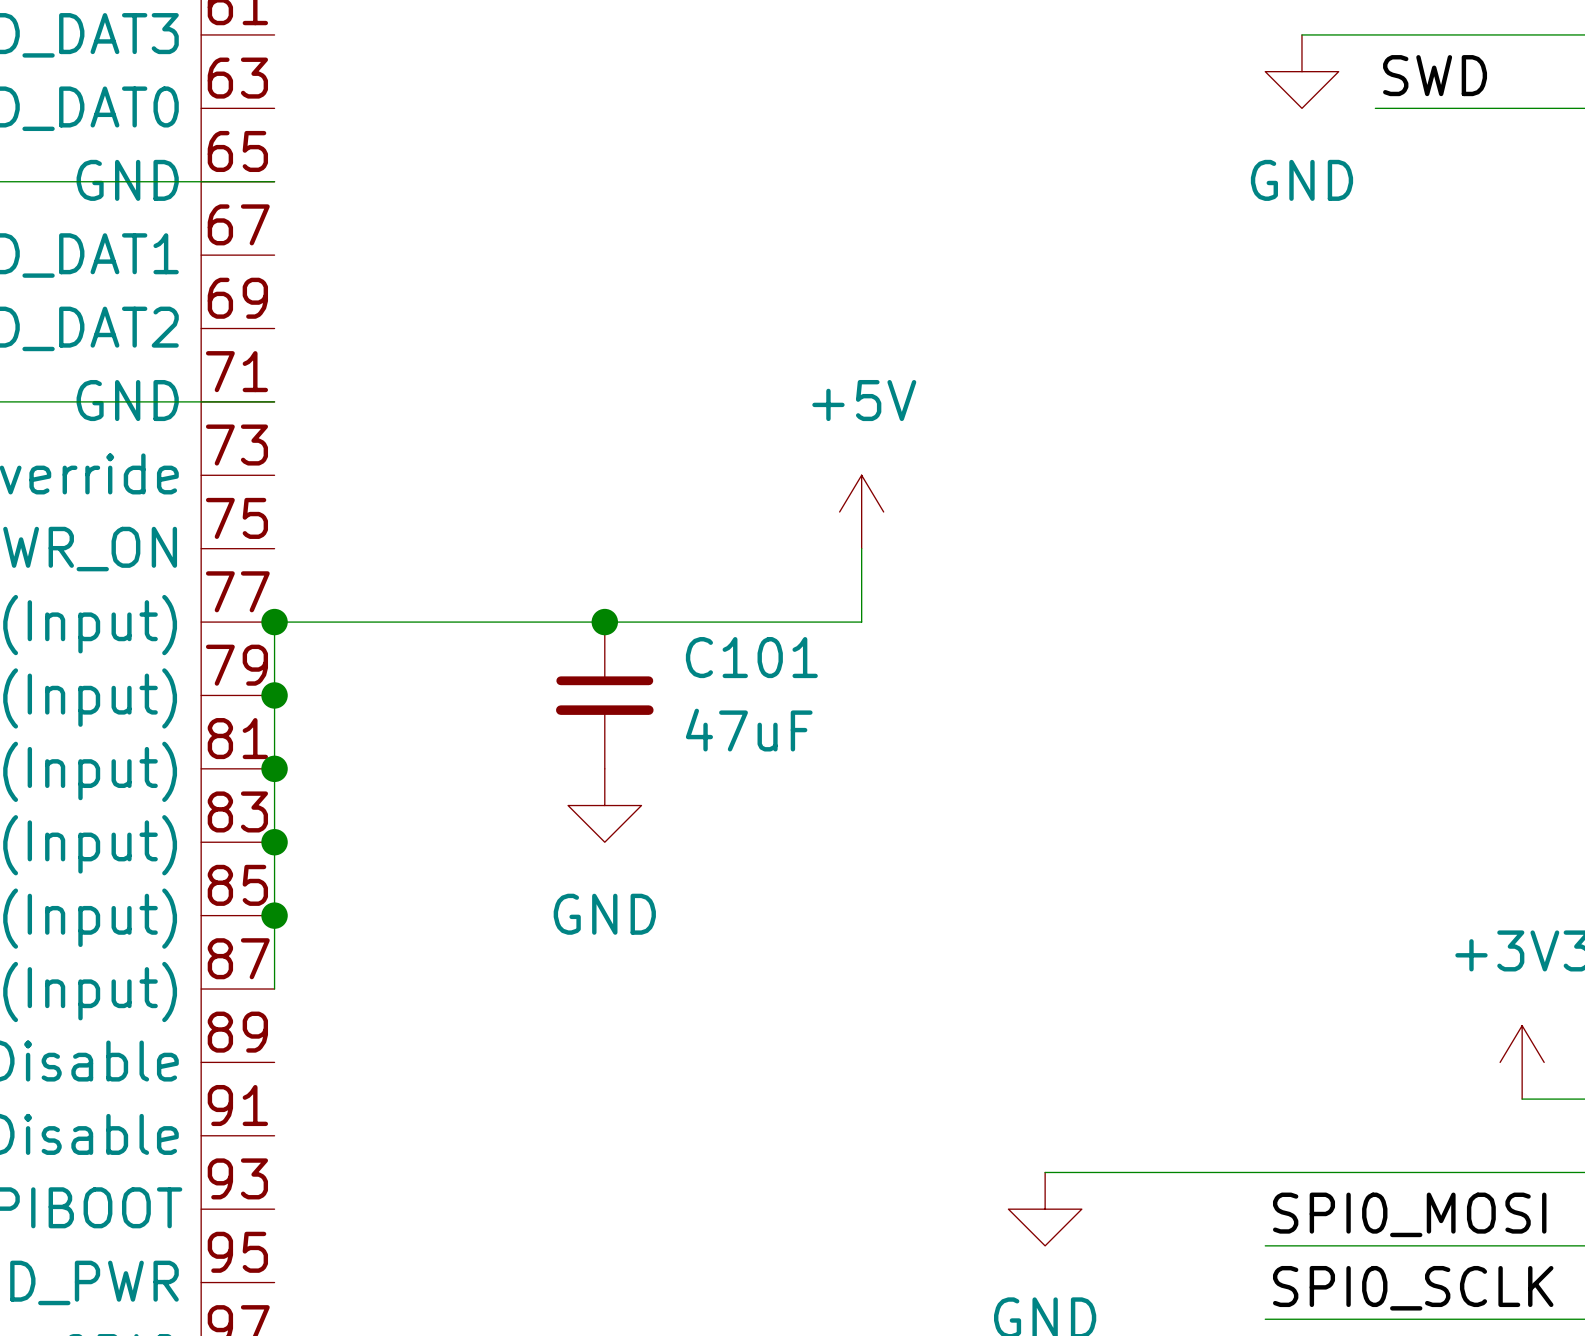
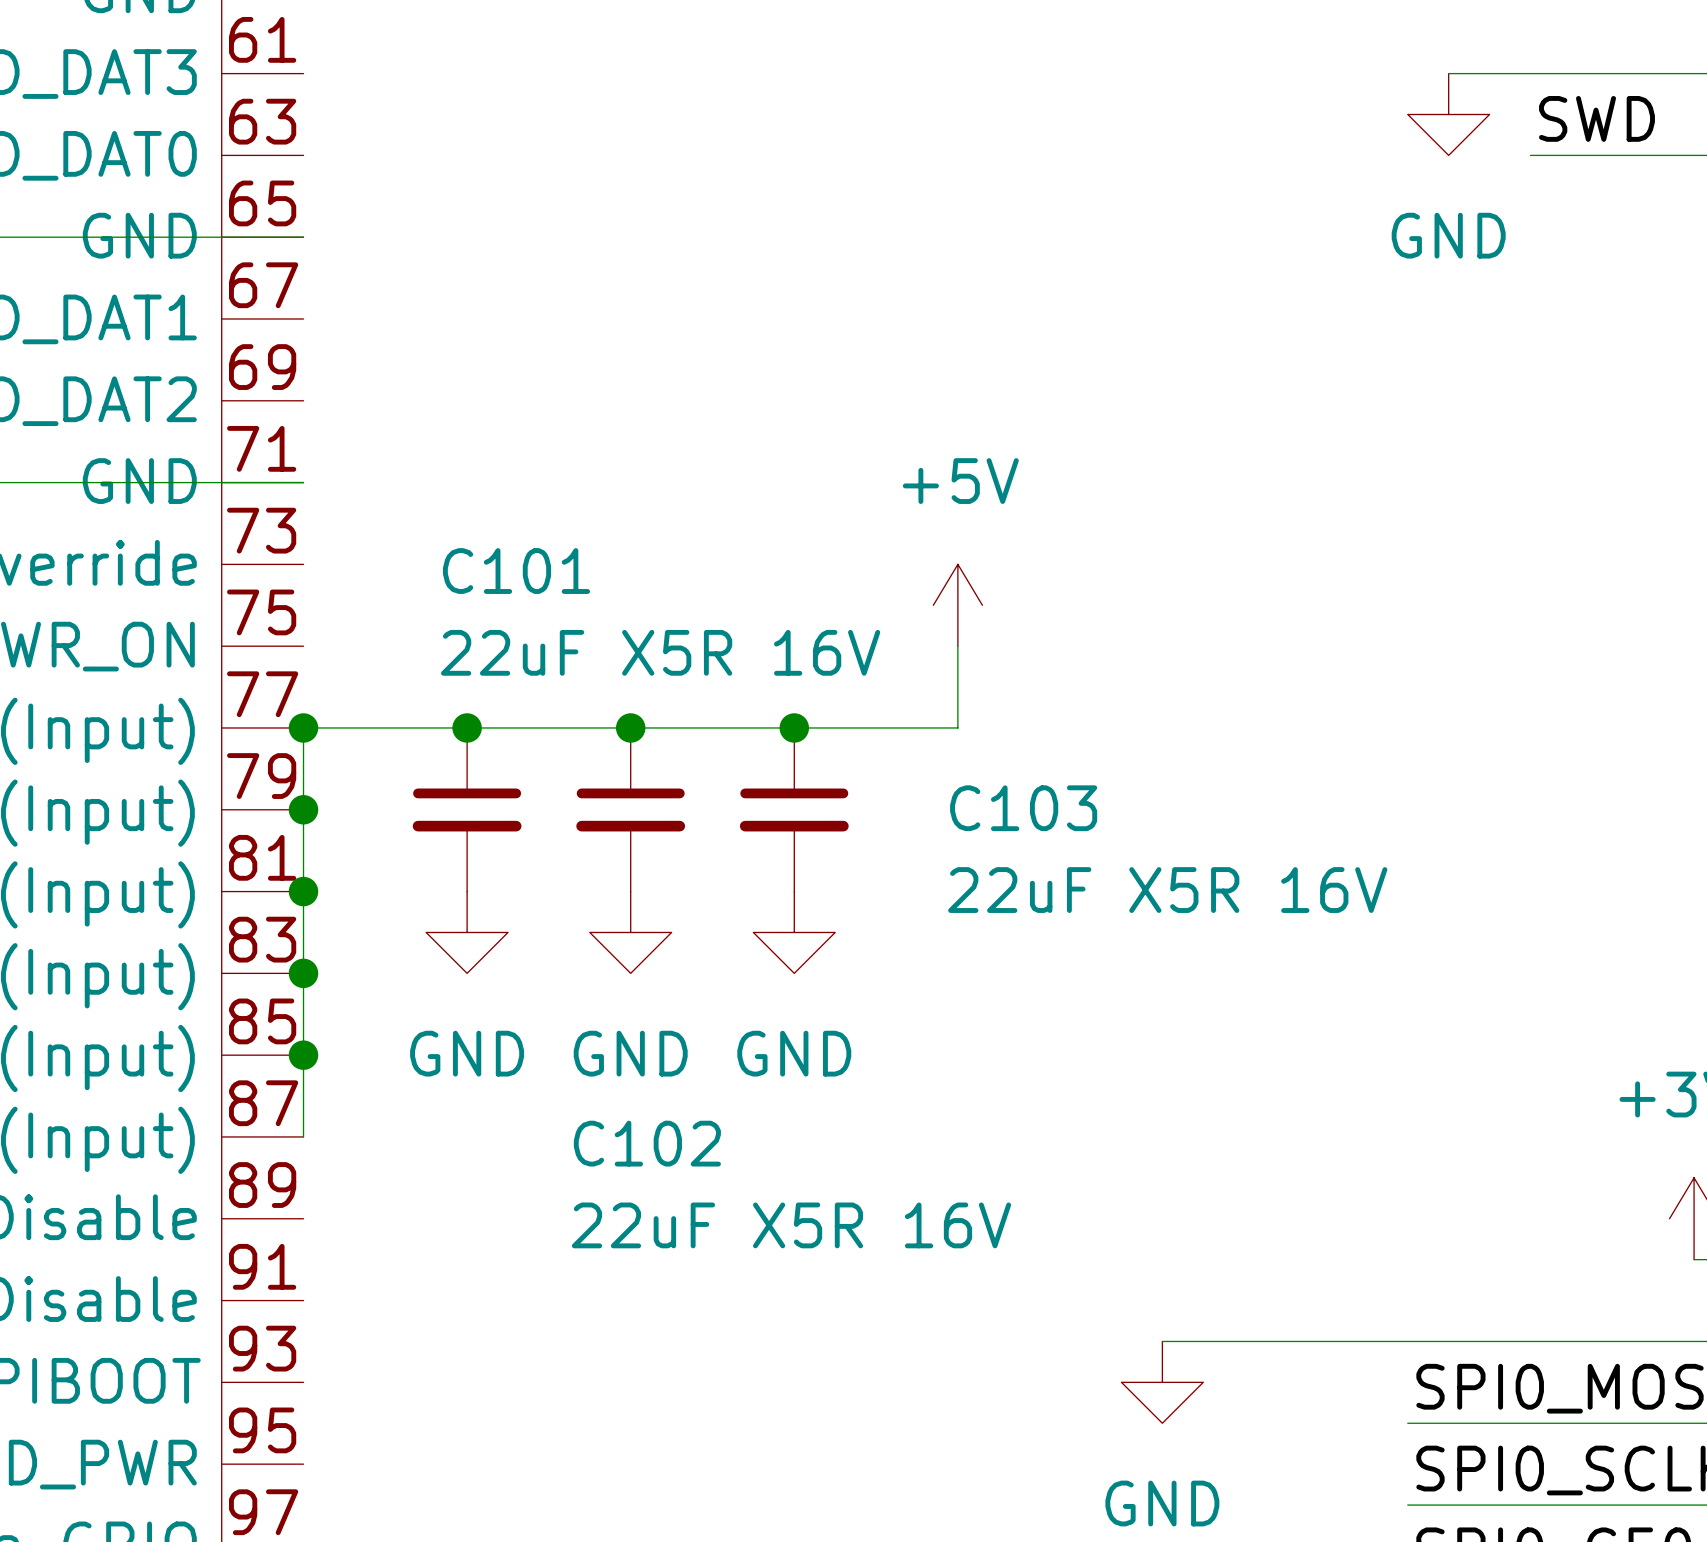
junction: none -> (467, 727)
junction position: (604, 622) -> (630, 727)
junction: none -> (794, 727)
C101 name position: C101 (751, 657) -> C101 (516, 571)
C102: none -> 22uF X5R 16V (630, 809)
C101 position: (604, 695) -> (467, 809)
C103: none -> 22uF X5R 16V (794, 809)
C101 value: 47uF (749, 730) -> 22uF X5R 16V (660, 652)
power symbol: none -> GND (467, 932)
power symbol position: GND (604, 805) -> GND (630, 932)
power symbol: none -> GND (794, 932)

